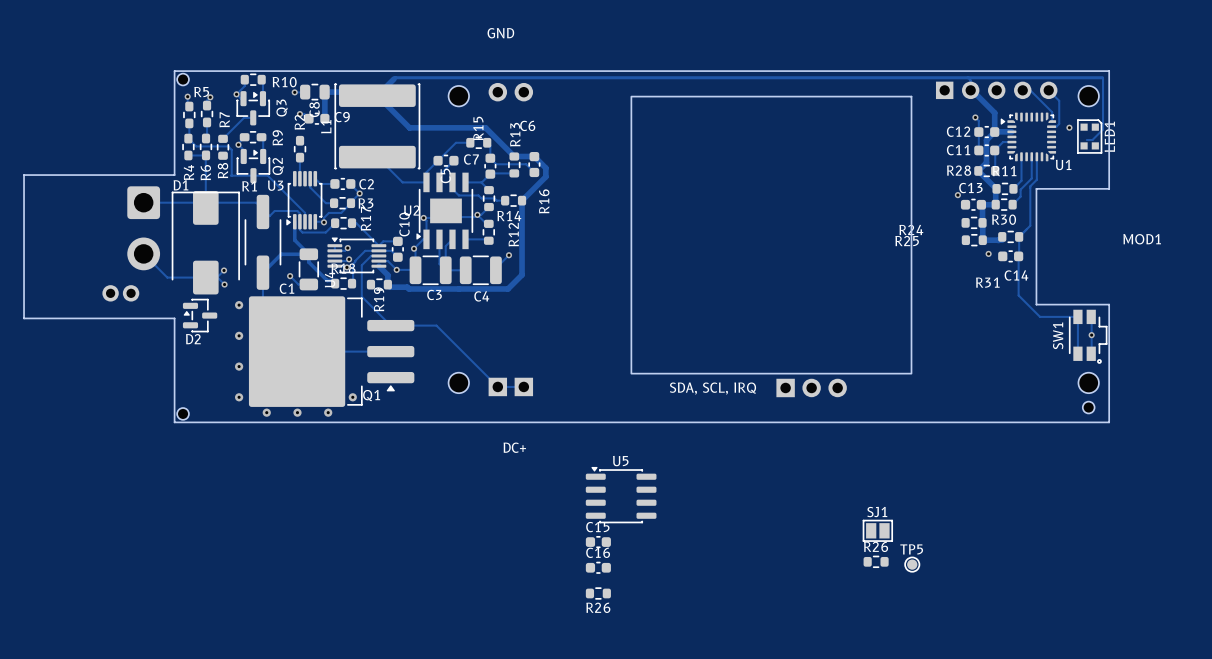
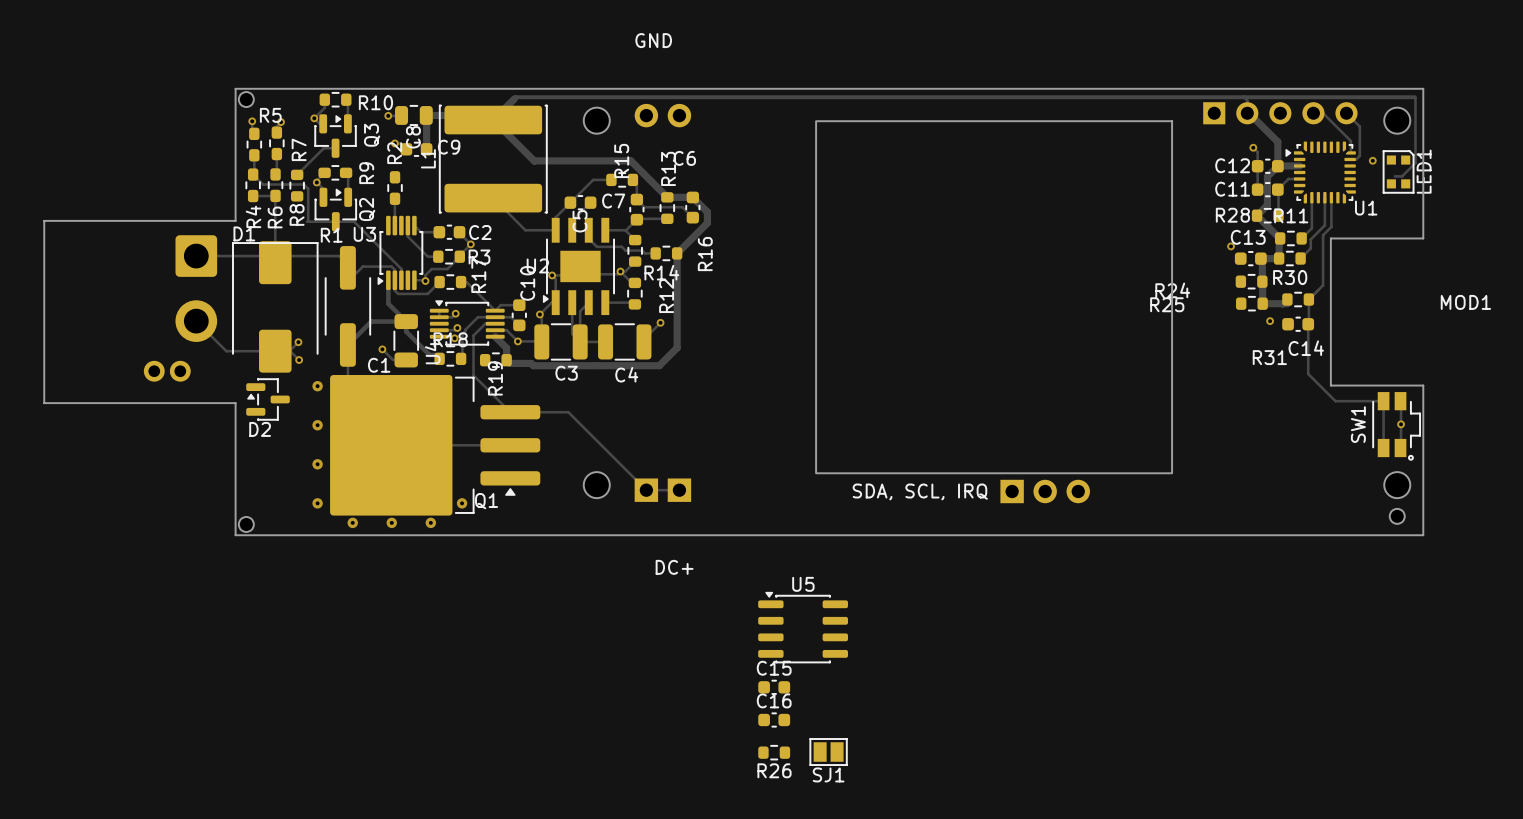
SJ1 name position: SJ1 (877, 512) -> SJ1 (828, 774)
SJ1 position: (877, 530) -> (828, 752)
R26: (876, 561) -> none
TP5: (912, 564) -> none

